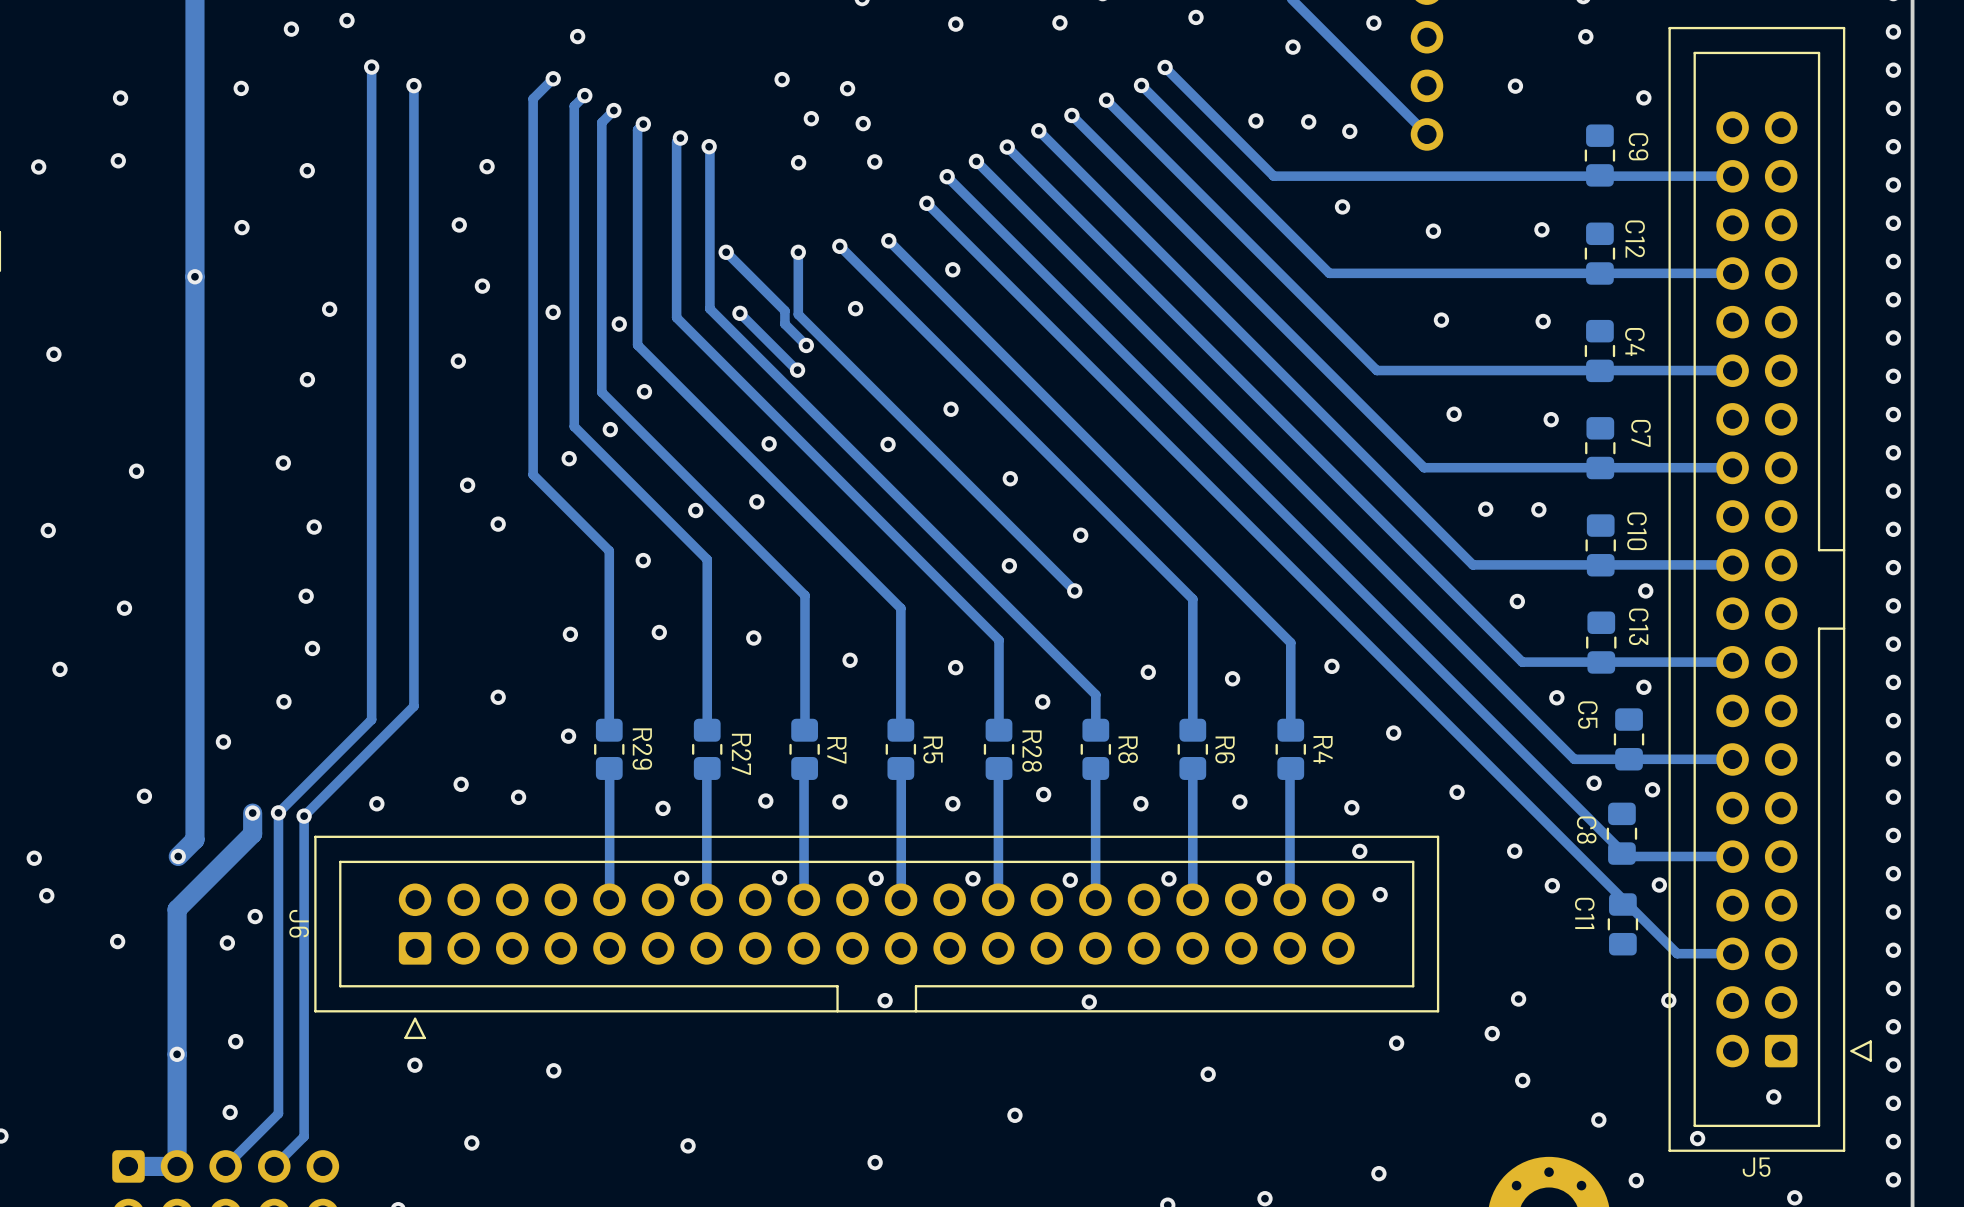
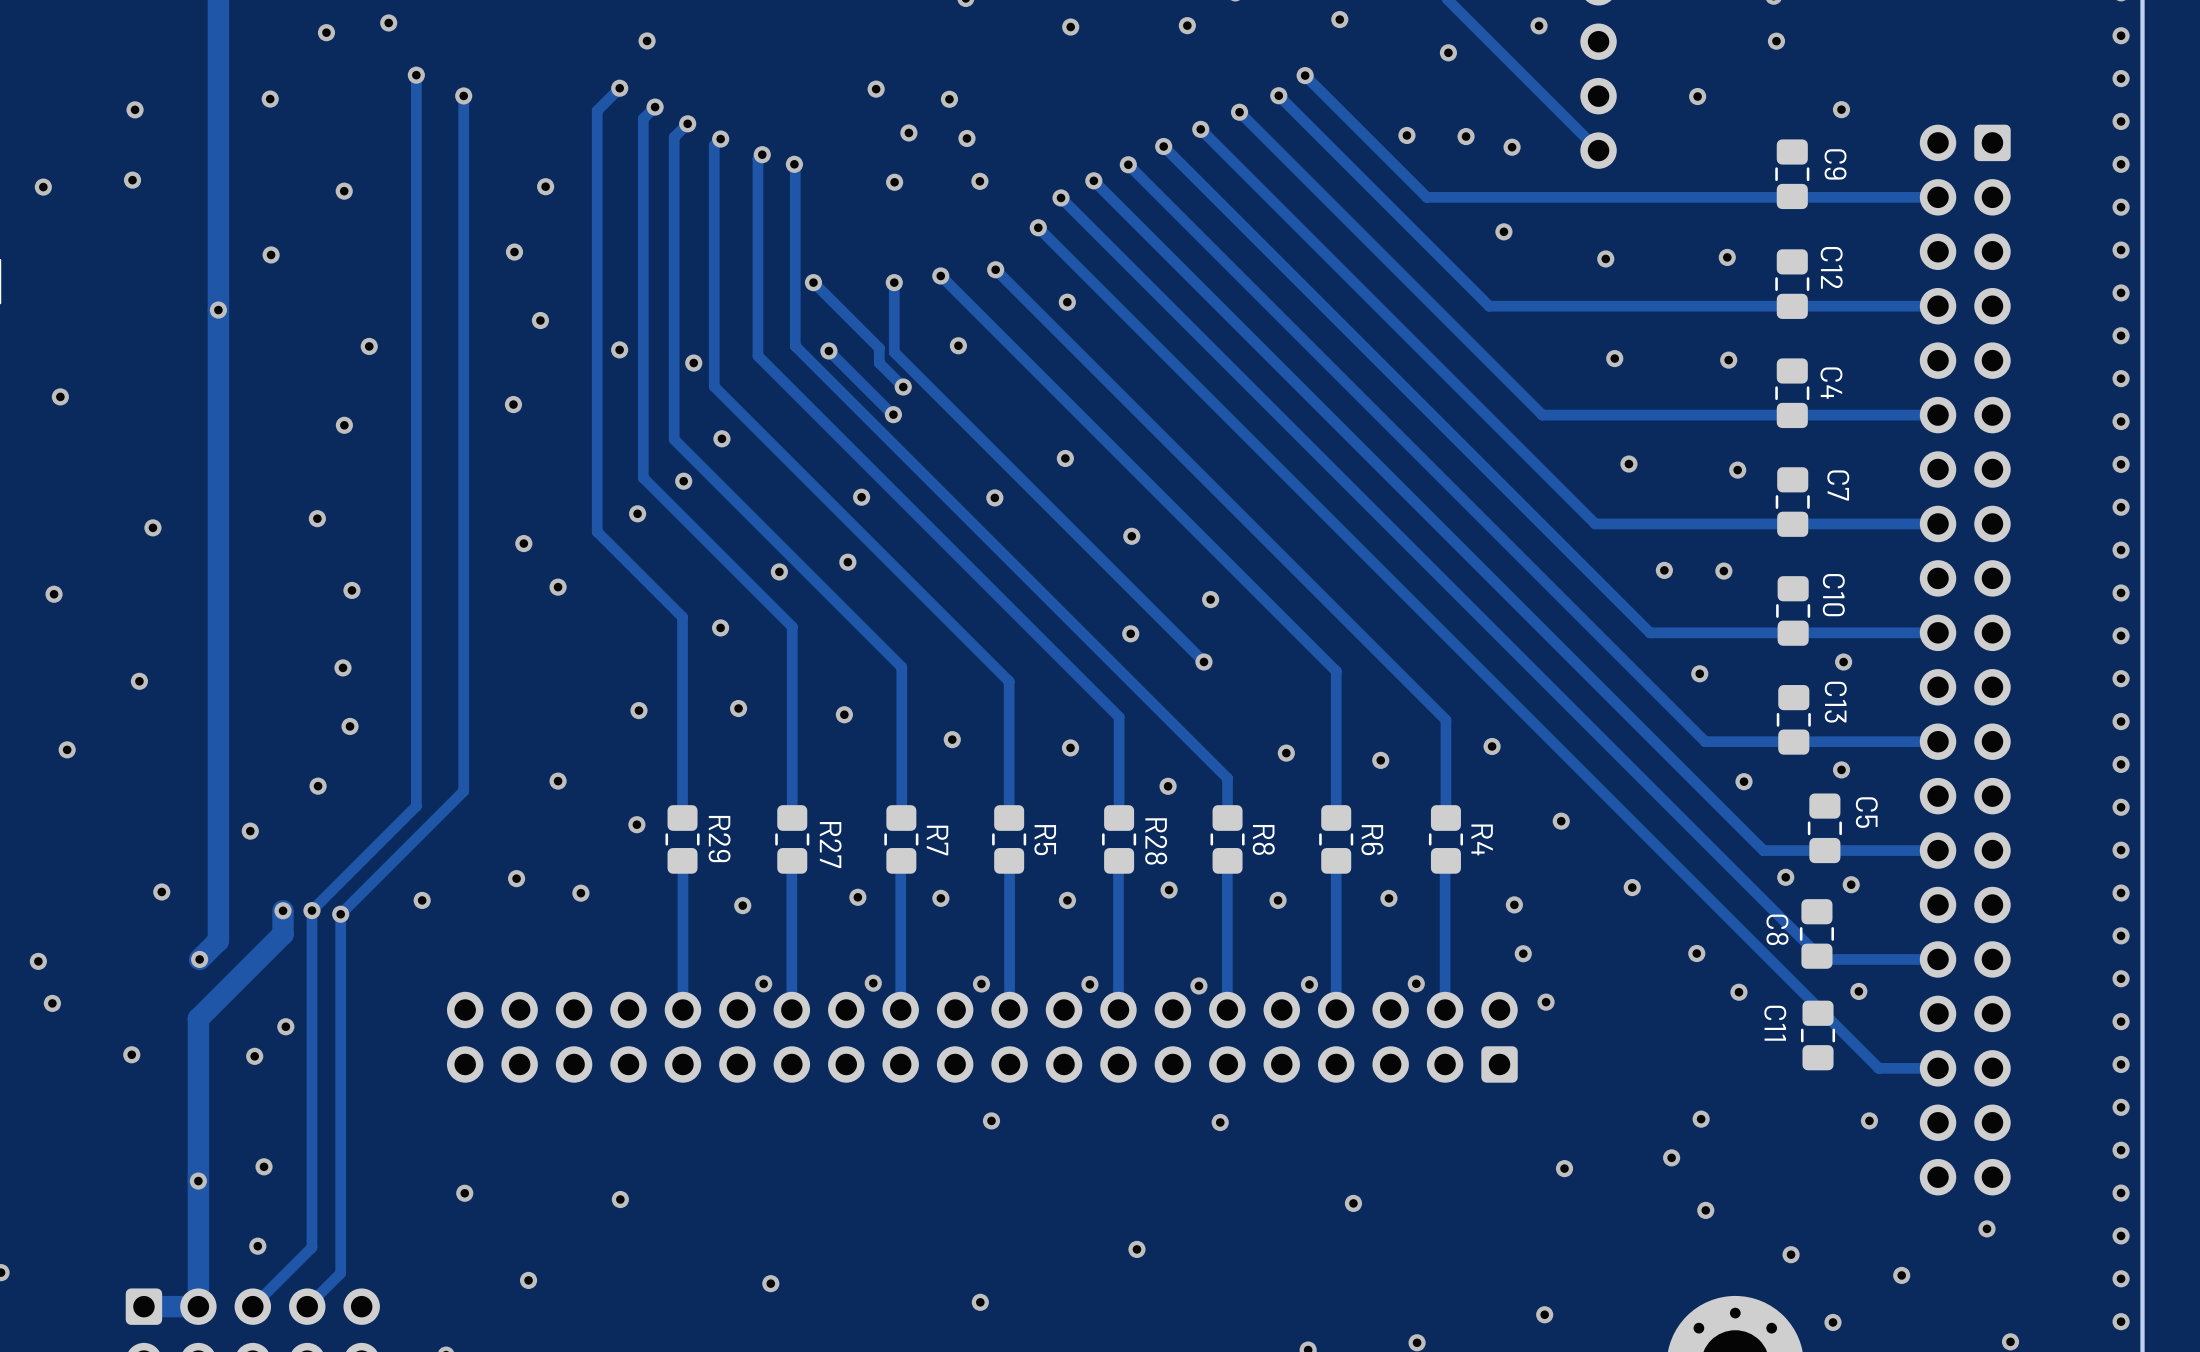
part: none -> (1965, 660)
J5: (1770, 589) -> none
C5 name position: C5 (1587, 715) -> C5 (1866, 812)
part: none -> (982, 1037)
J6: (876, 937) -> none

